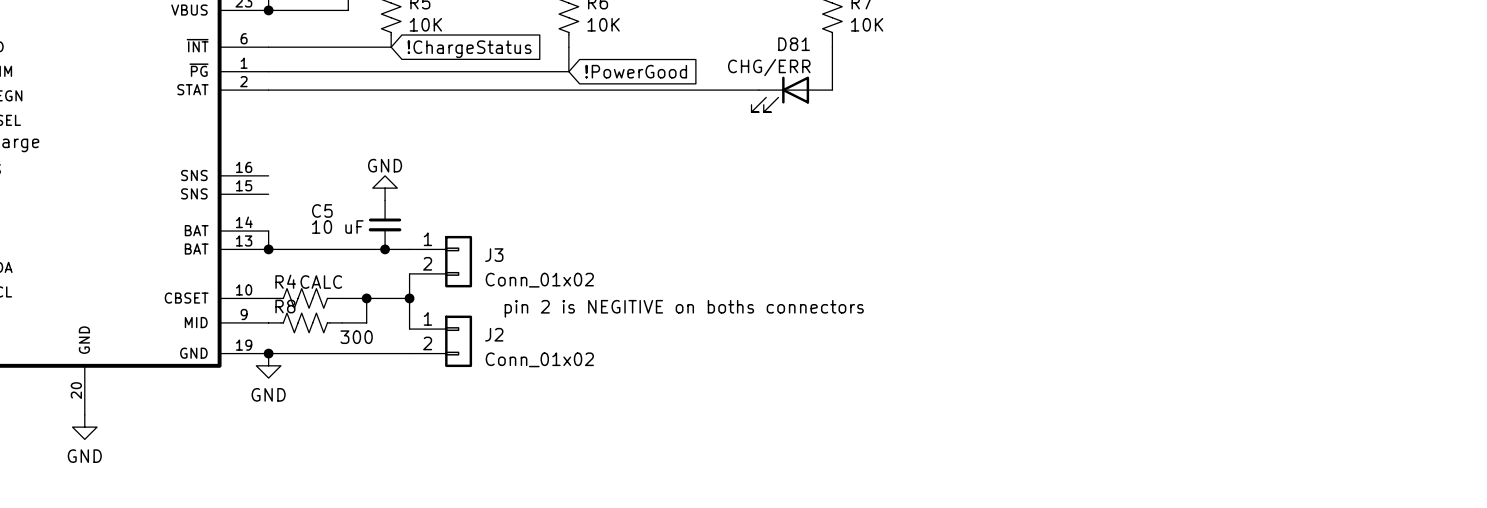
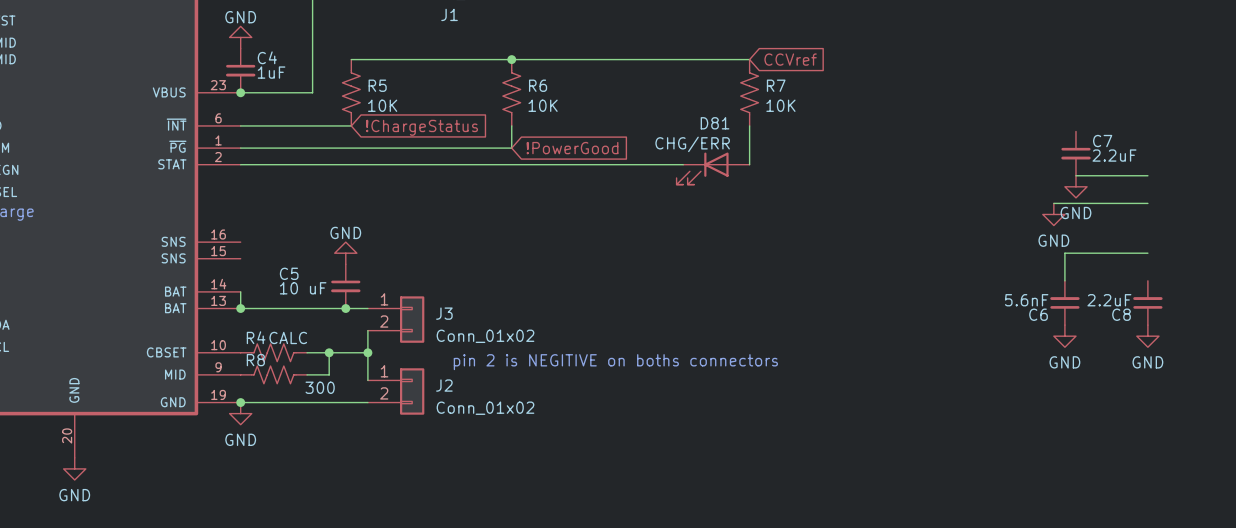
C7: none -> 2.2uF (1075, 153)
wire: none -> (1075, 175) (1147, 175)
power symbol: none -> GND (1075, 186)
wire: none -> (1053, 203) (1147, 203)
power symbol: none -> GND (1053, 214)
wire: none -> (1147, 253) (1064, 253) (1064, 280)
C6: none -> 5.6nF (1064, 302)
C8: none -> 2.2uF (1147, 302)
power symbol: none -> GND (1064, 336)
power symbol: none -> GND (1147, 336)

